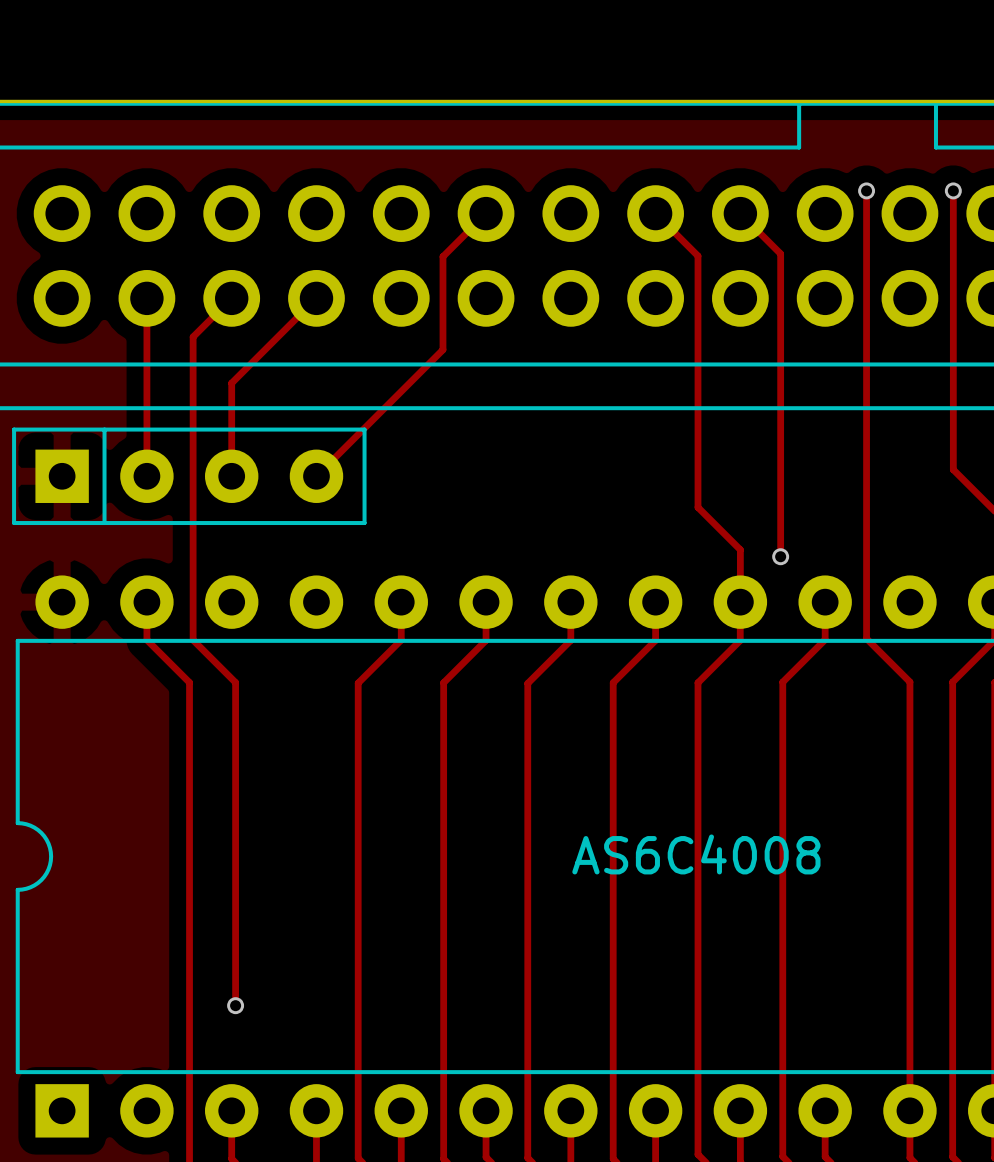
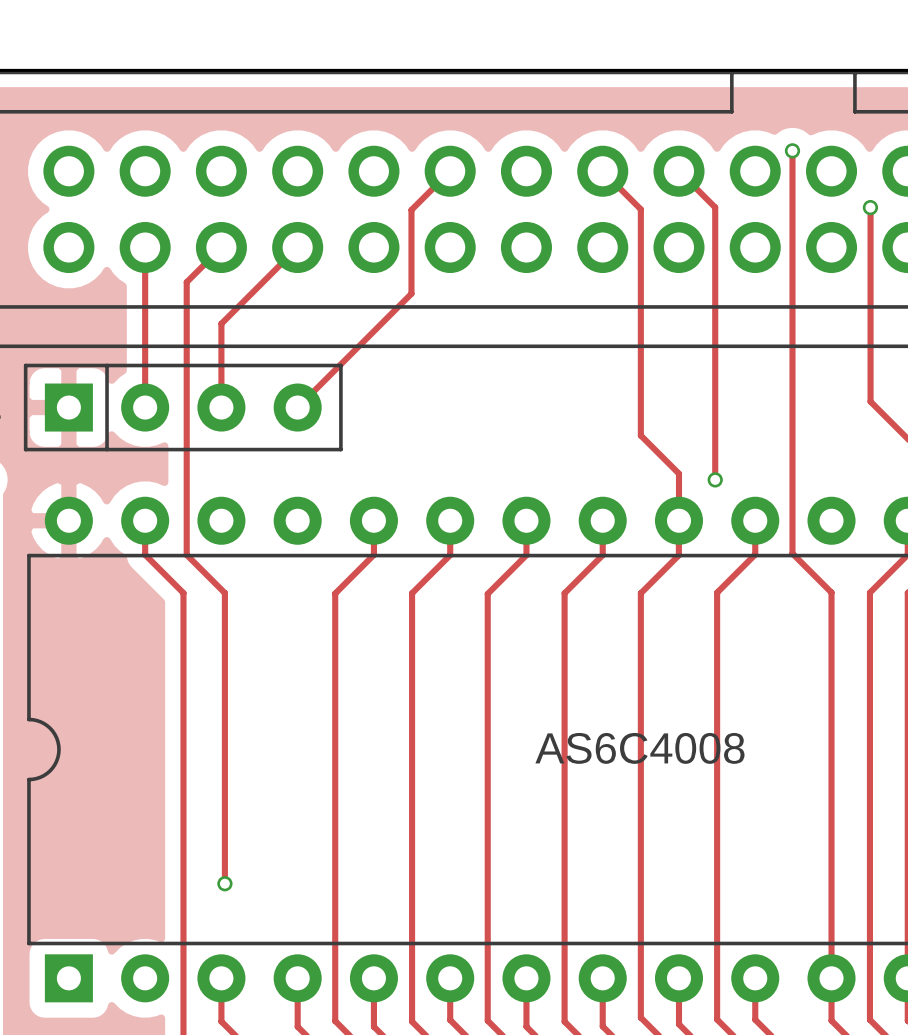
via position: (953, 190) -> (870, 207)
track: (953, 191) (953, 254) -> none

